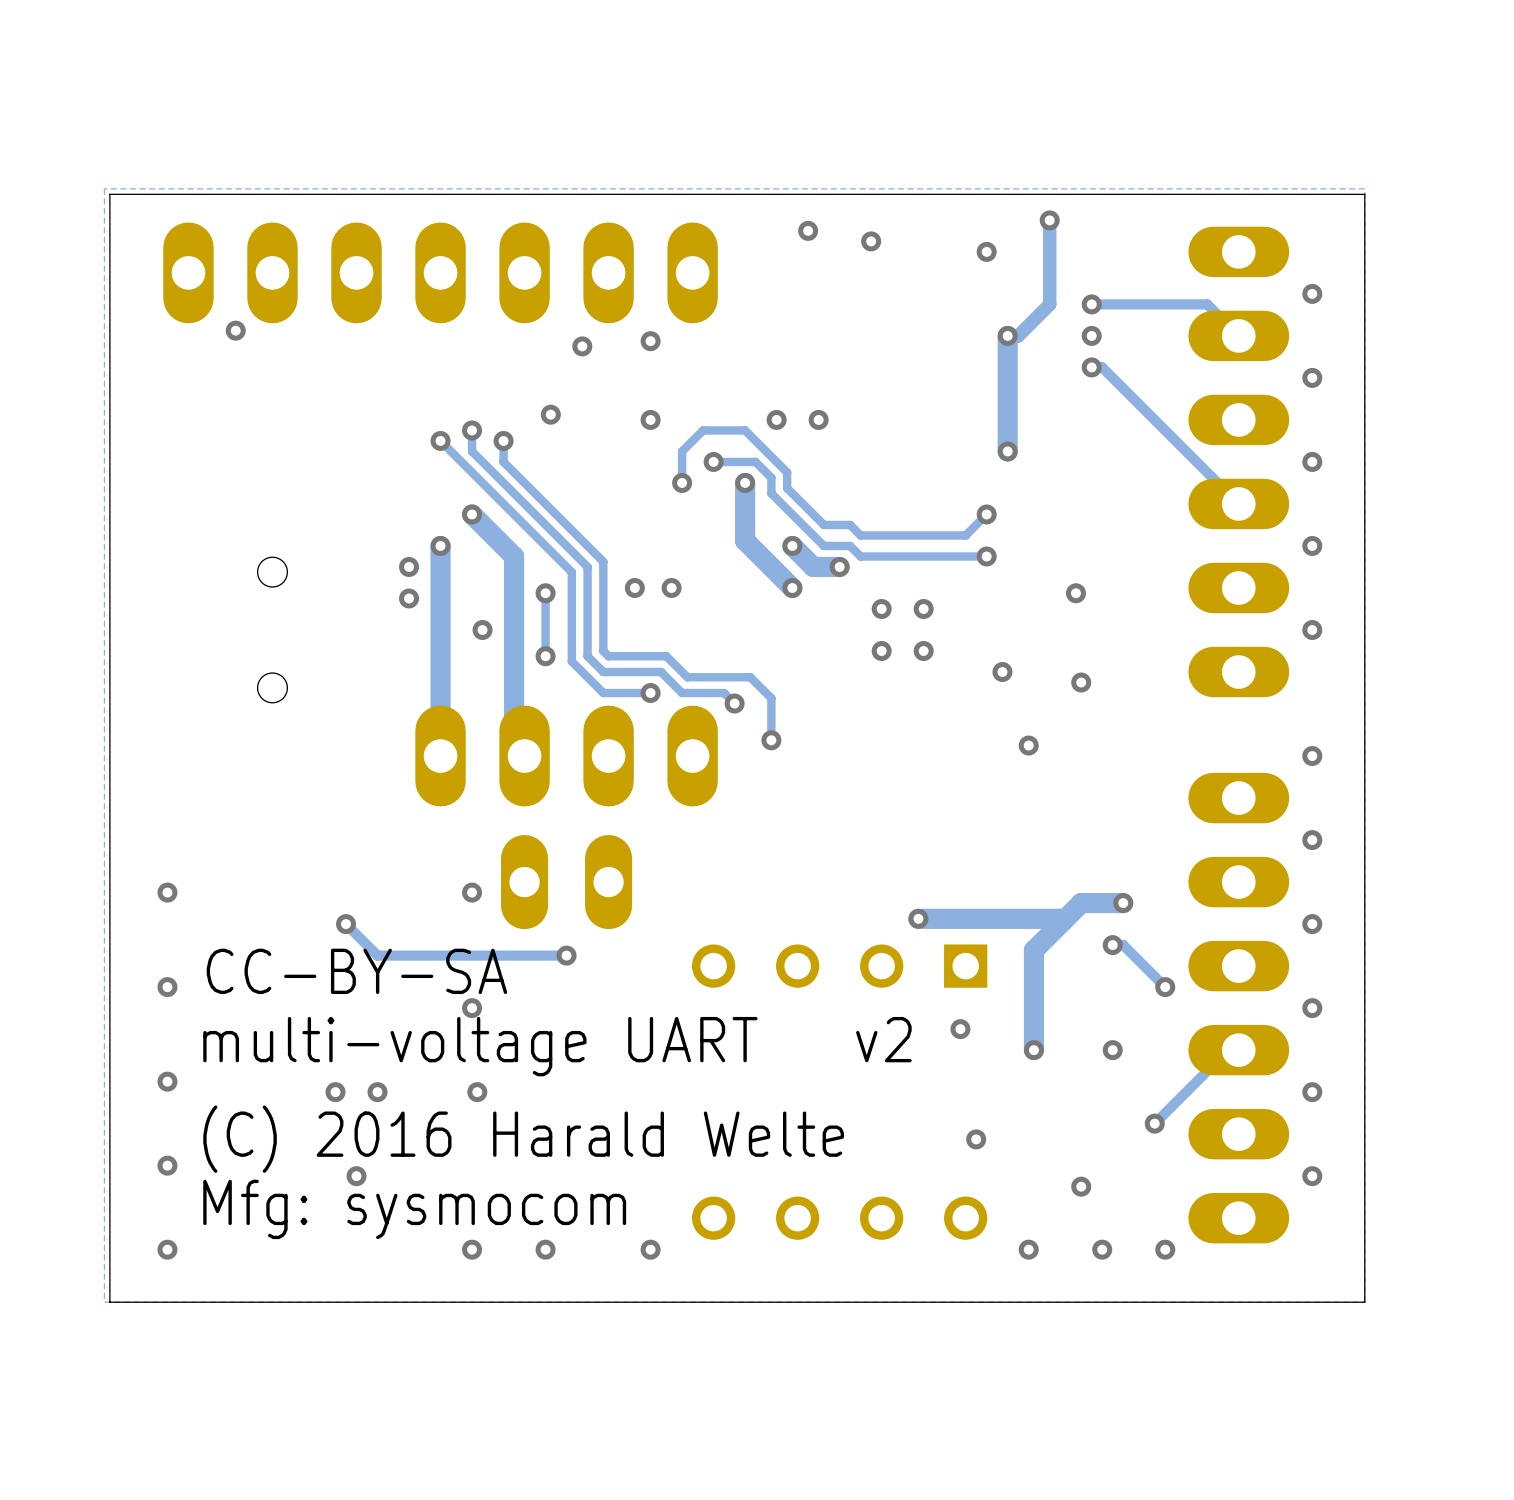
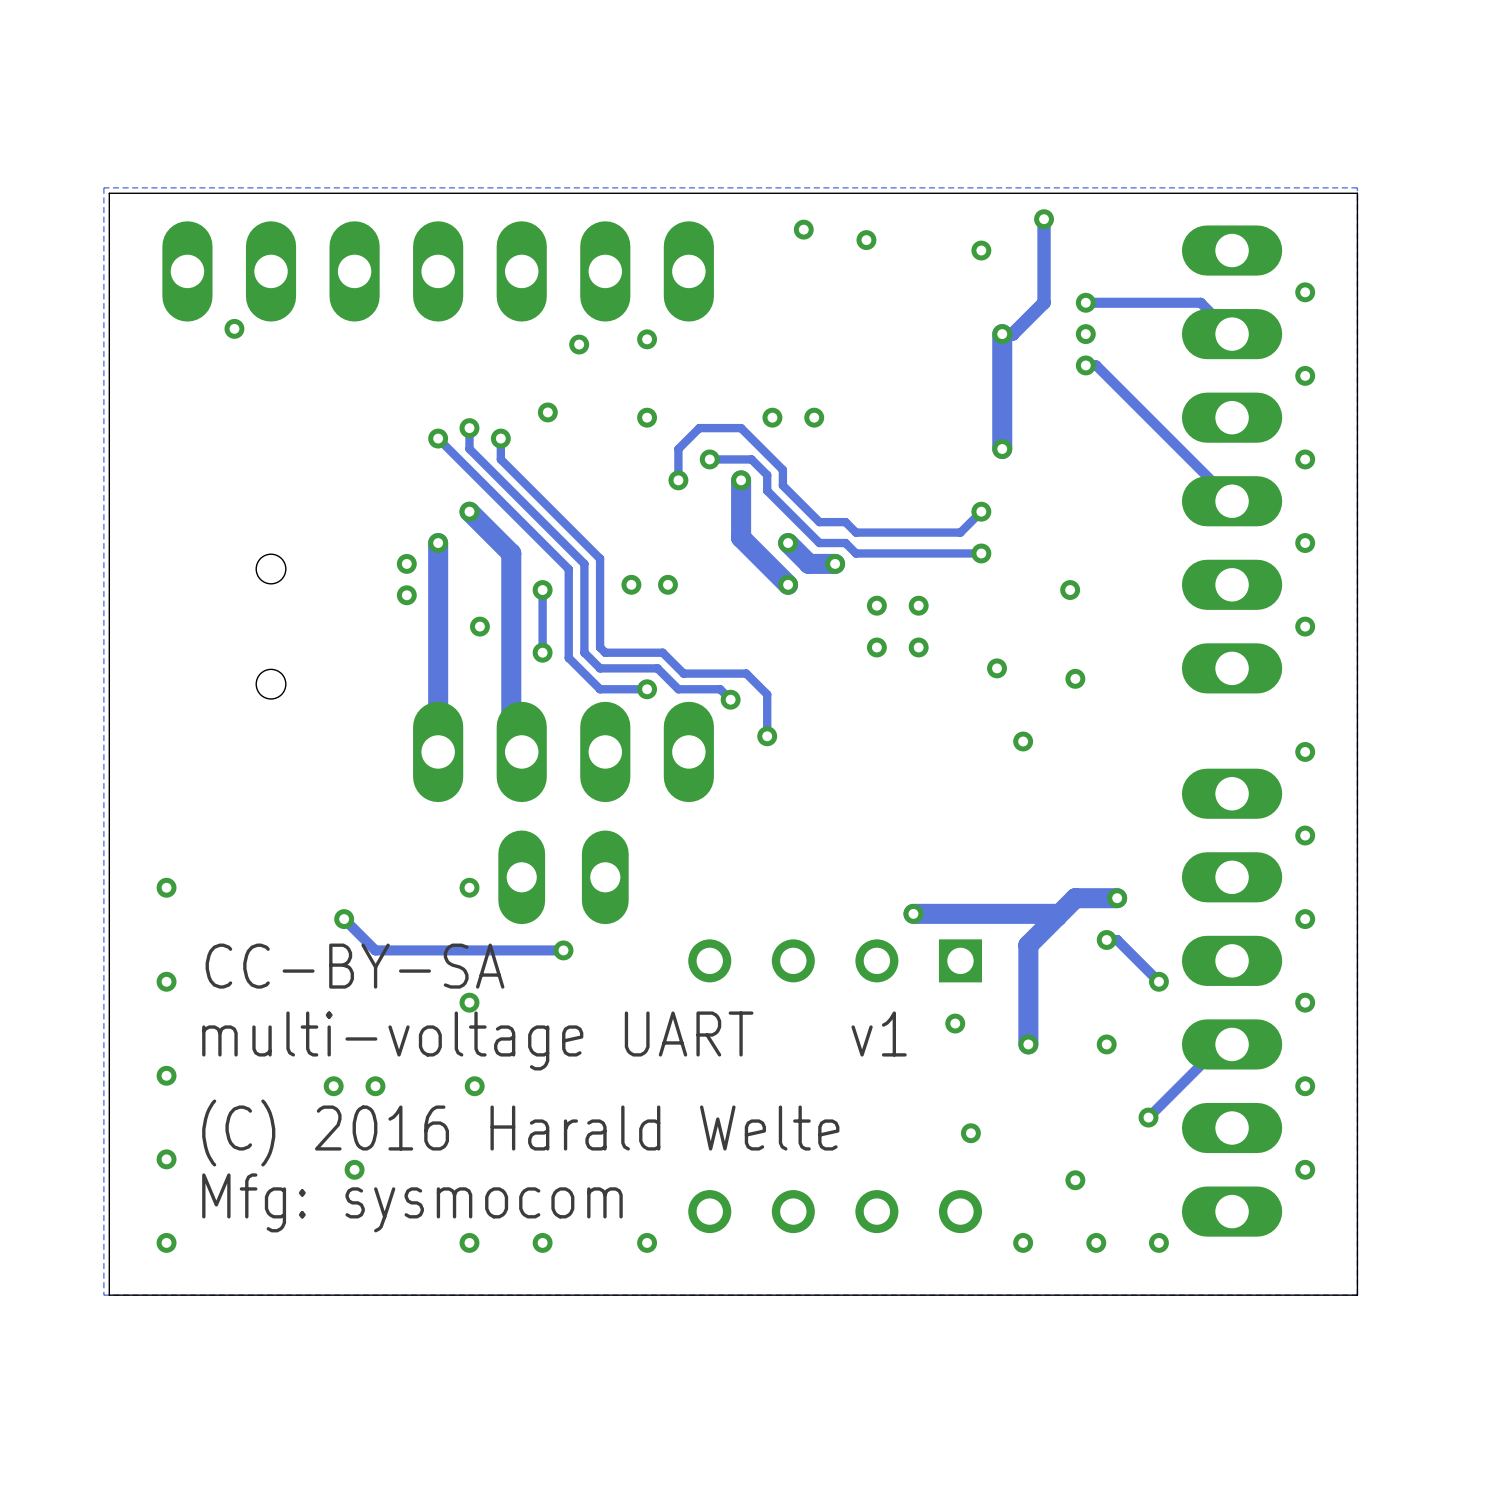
text: v2 (883, 1039) -> v1 (879, 1034)

